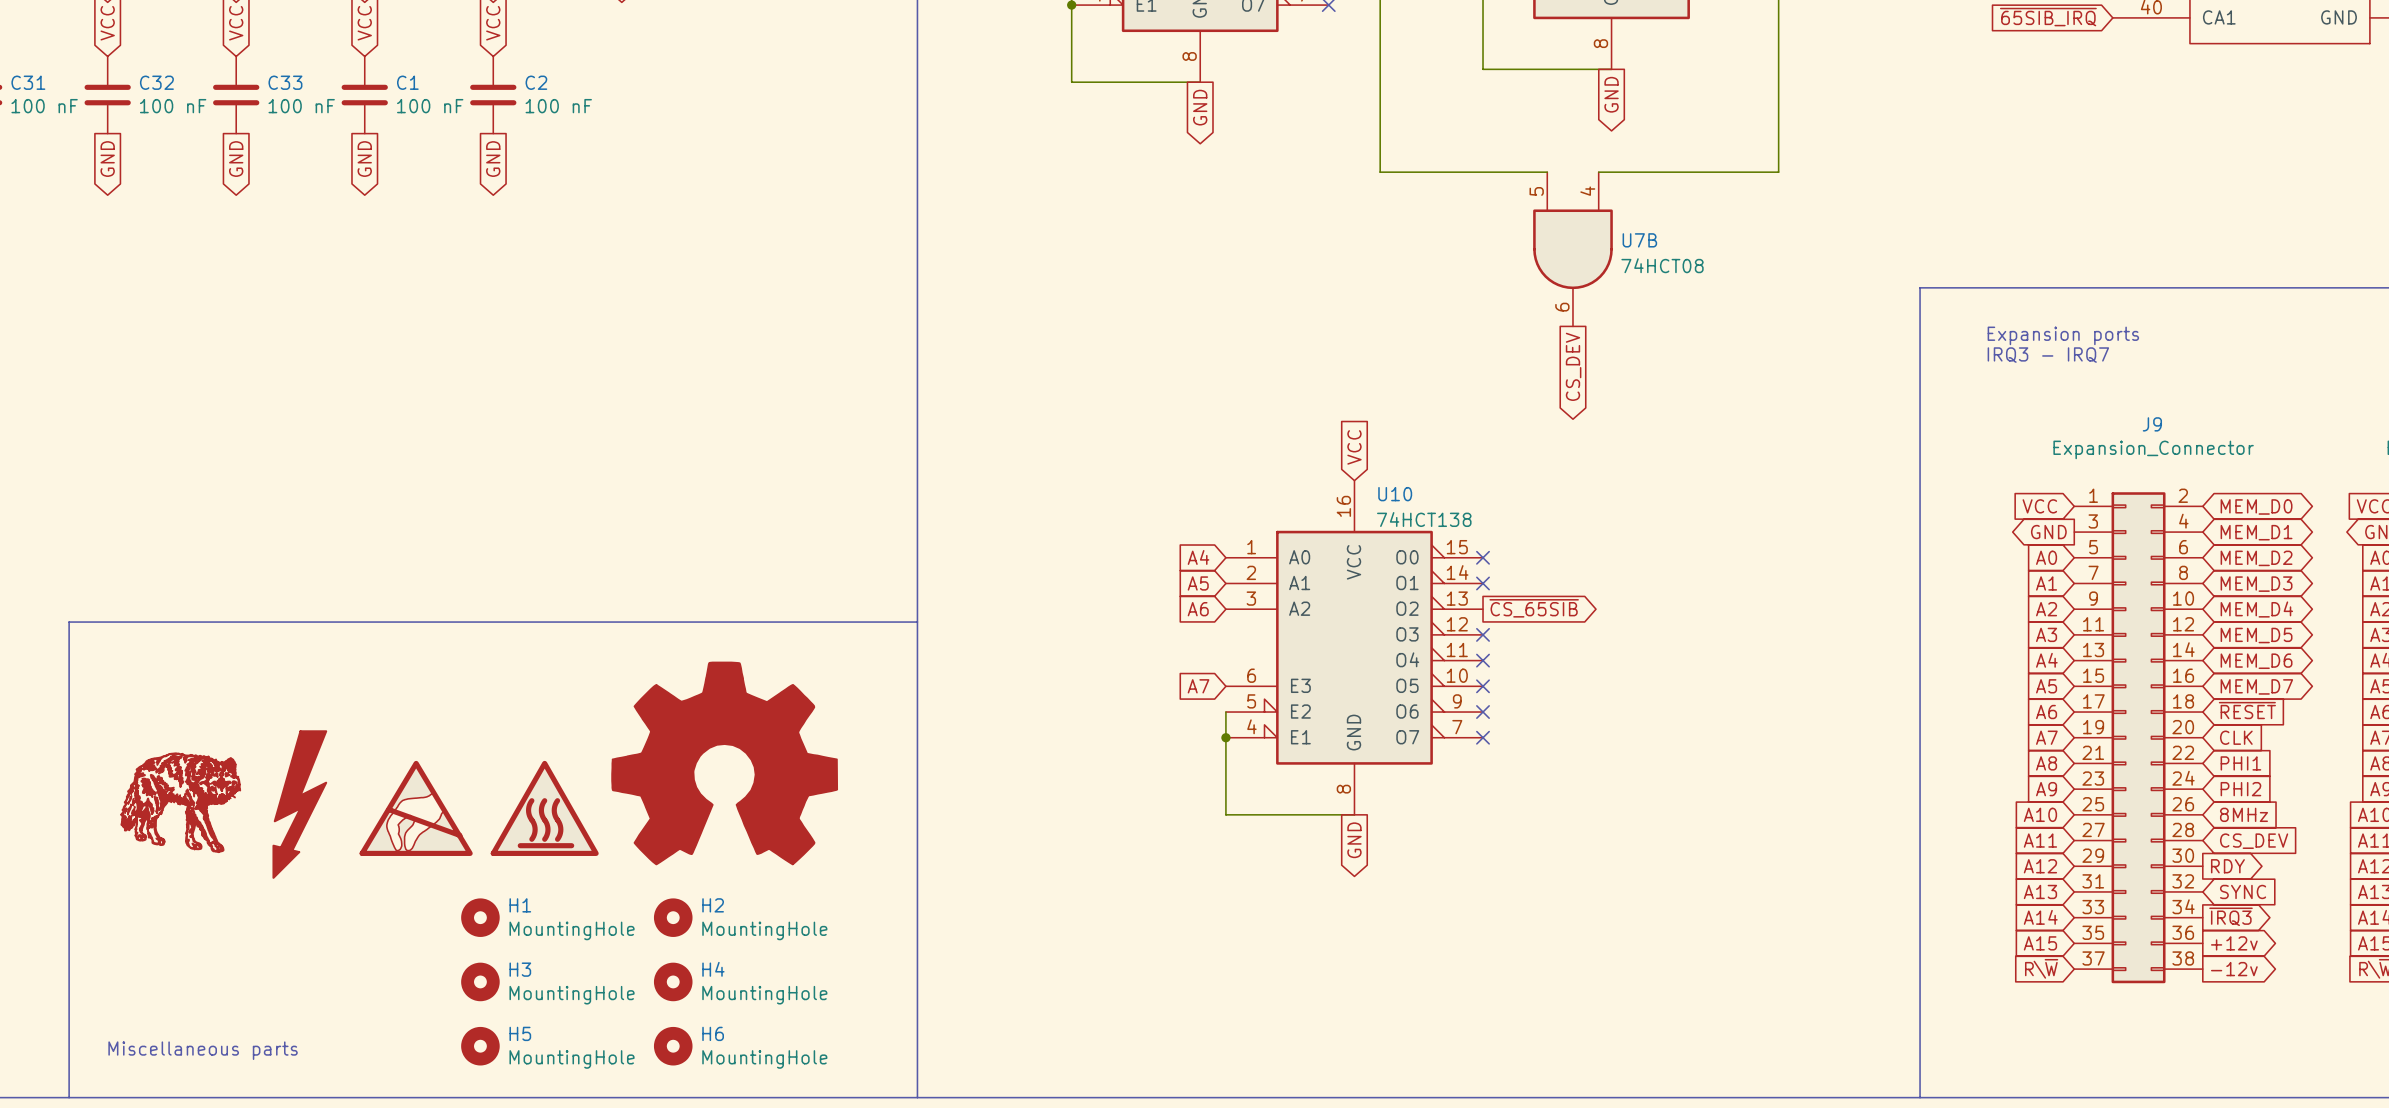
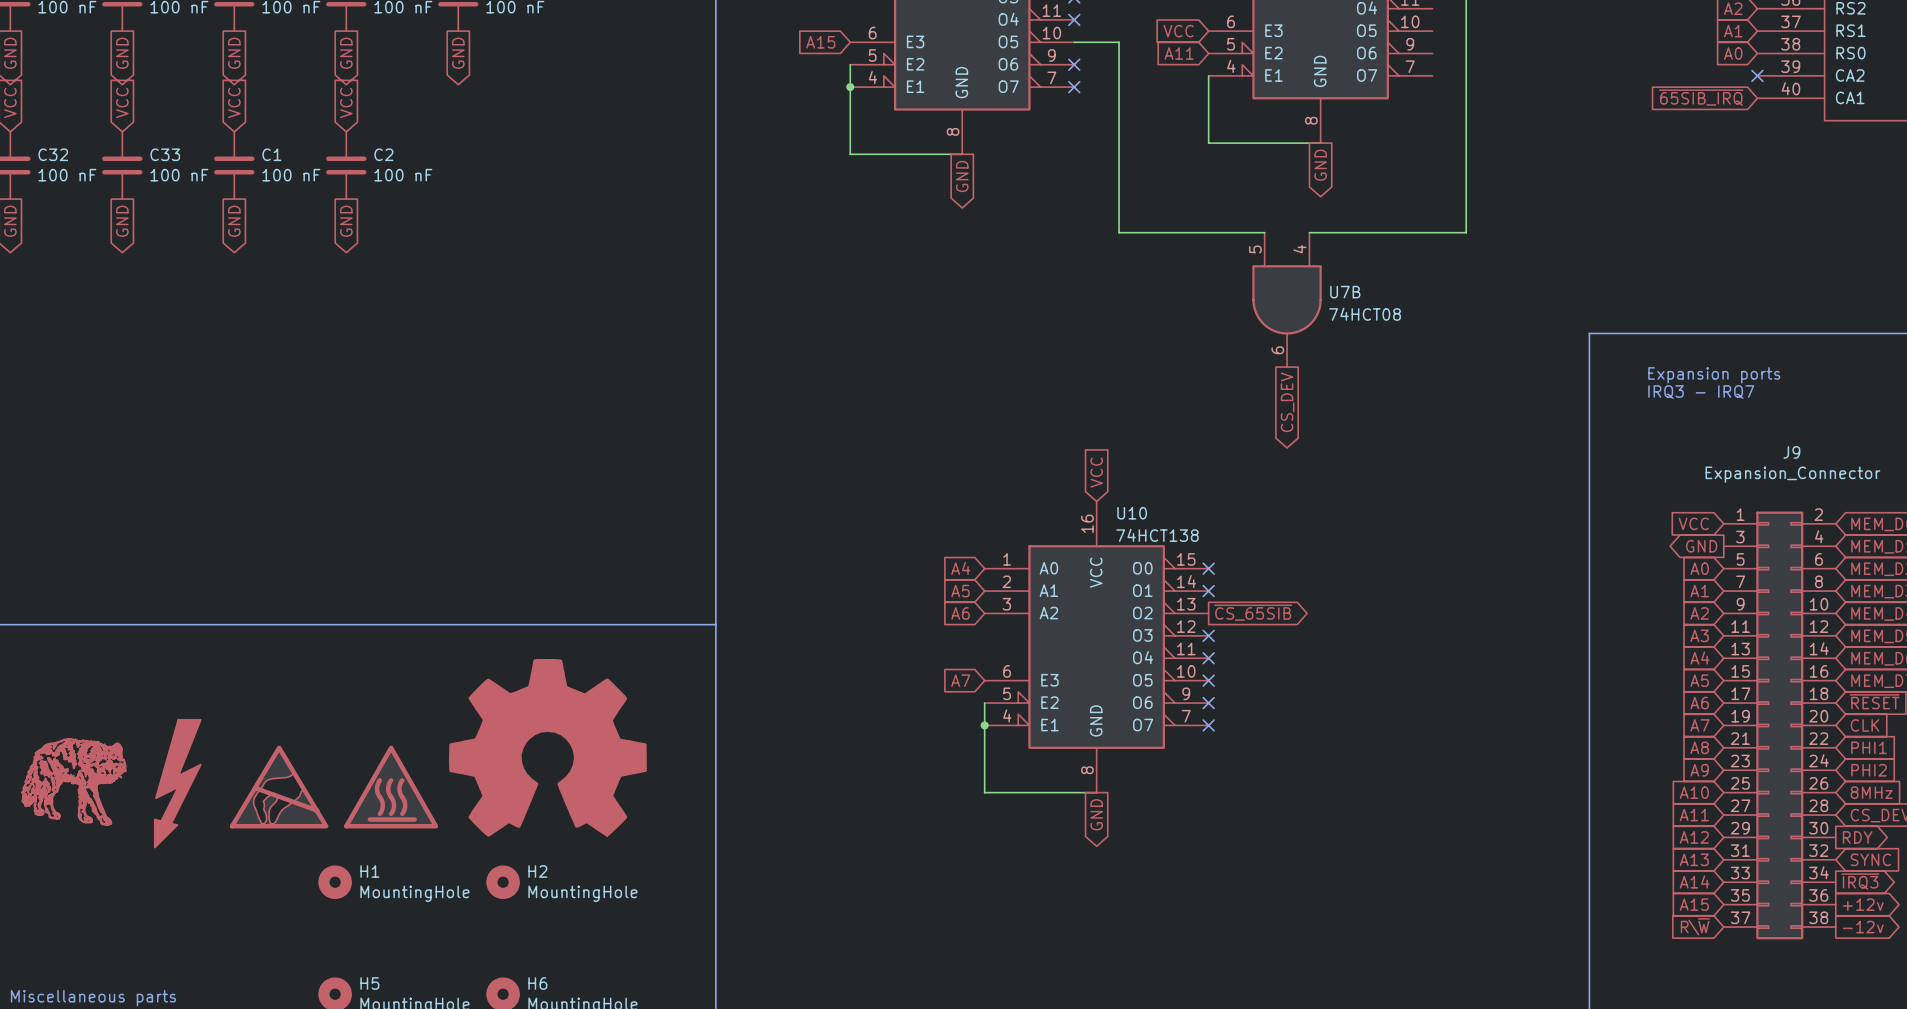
H3: MountingHole (480, 981) -> none
H4: MountingHole (673, 981) -> none

